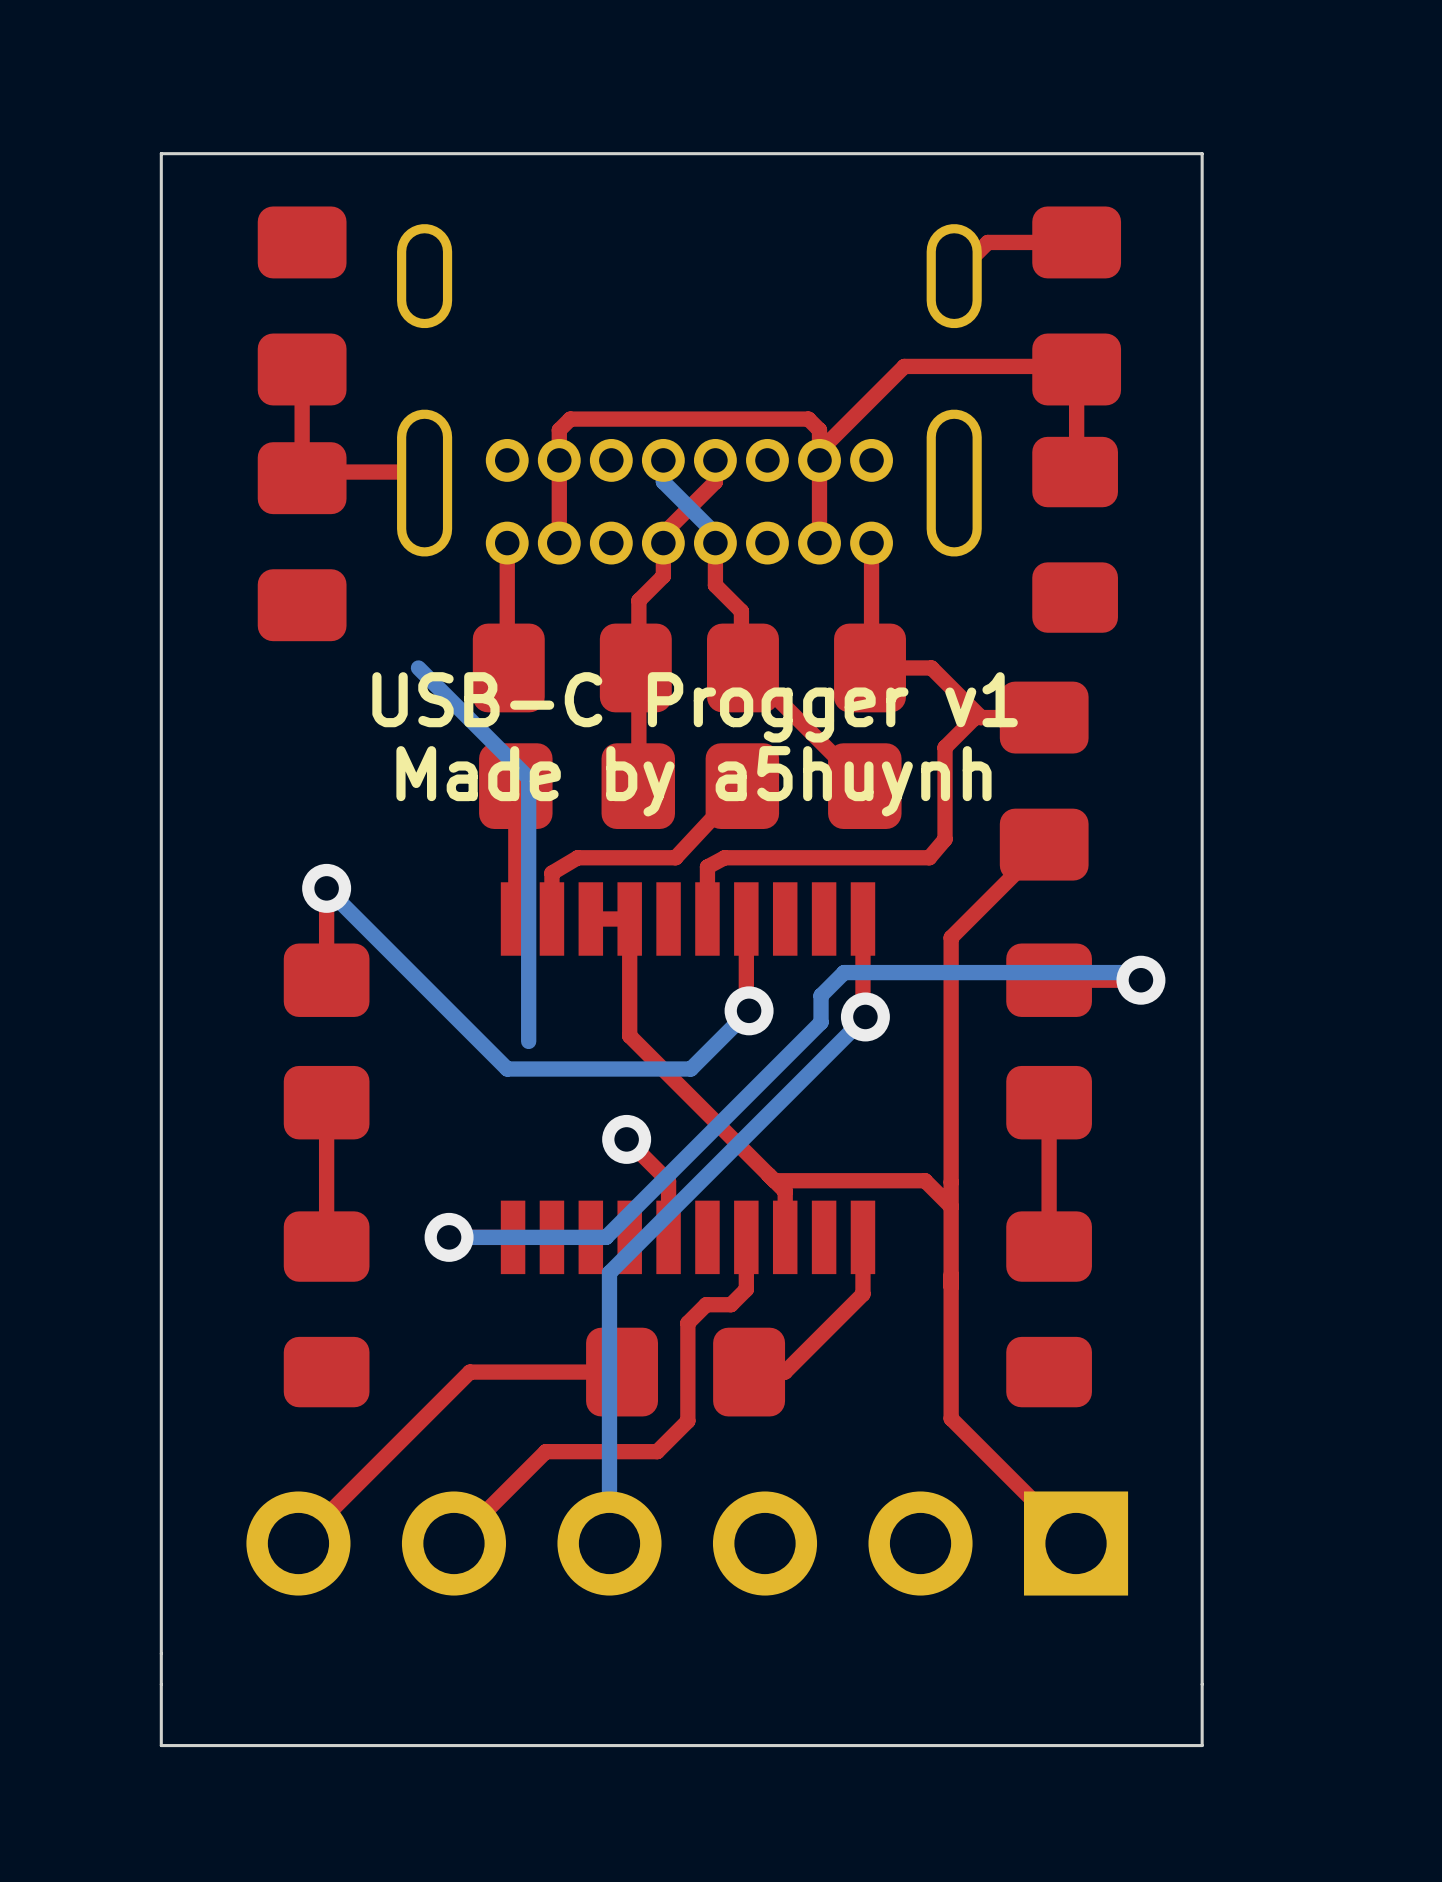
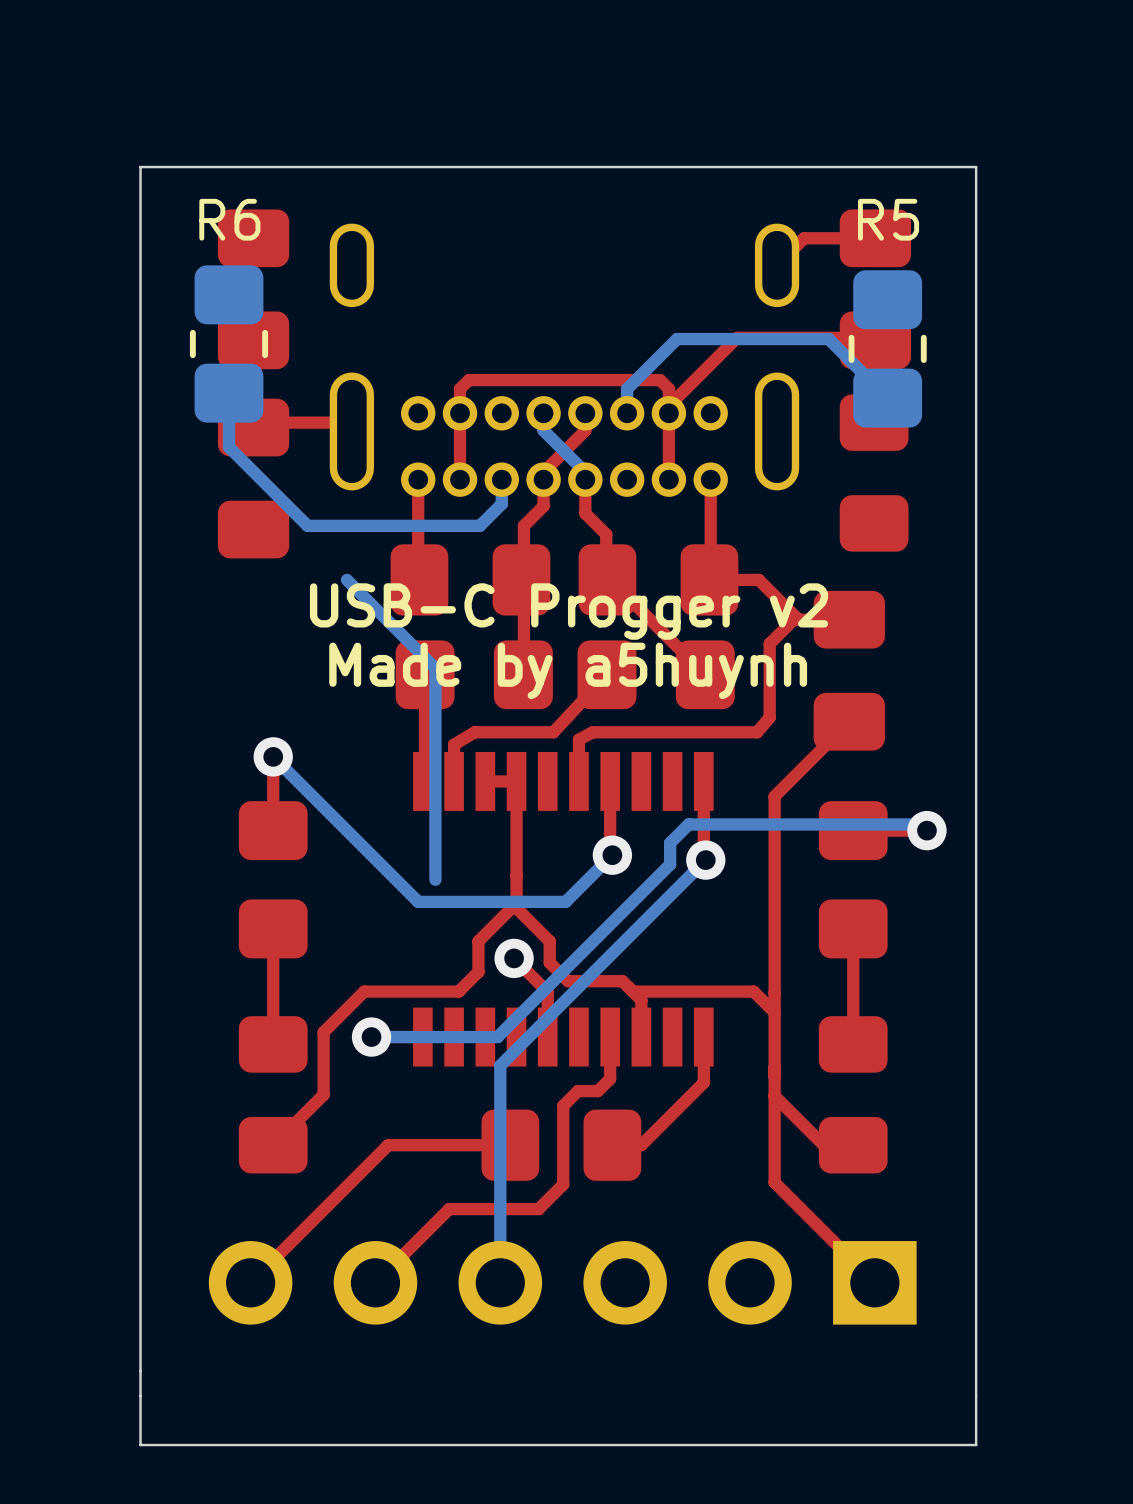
R6: none -> (228, 343)
R5: none -> (887, 348)
bottom track: none -> (228, 393) (228, 447) (307, 525) (479, 525) (501, 503) (501, 479)
bottom track: none -> (887, 398) (828, 339) (677, 339) (627, 388) (627, 413)
text: USB-C Progger v1 (695, 707) -> USB-C Progger v2 (569, 611)
top track: (629, 1035) (761, 1167) -> (516, 875) (516, 908) (549, 941) (549, 962) (568, 981) (622, 981)
top track: none -> (516, 903) (478, 941) (478, 971) (458, 991) (364, 991) (323, 1032) (323, 1094) (273, 1145)
top track: none -> (774, 1096) (823, 1145) (853, 1145)

